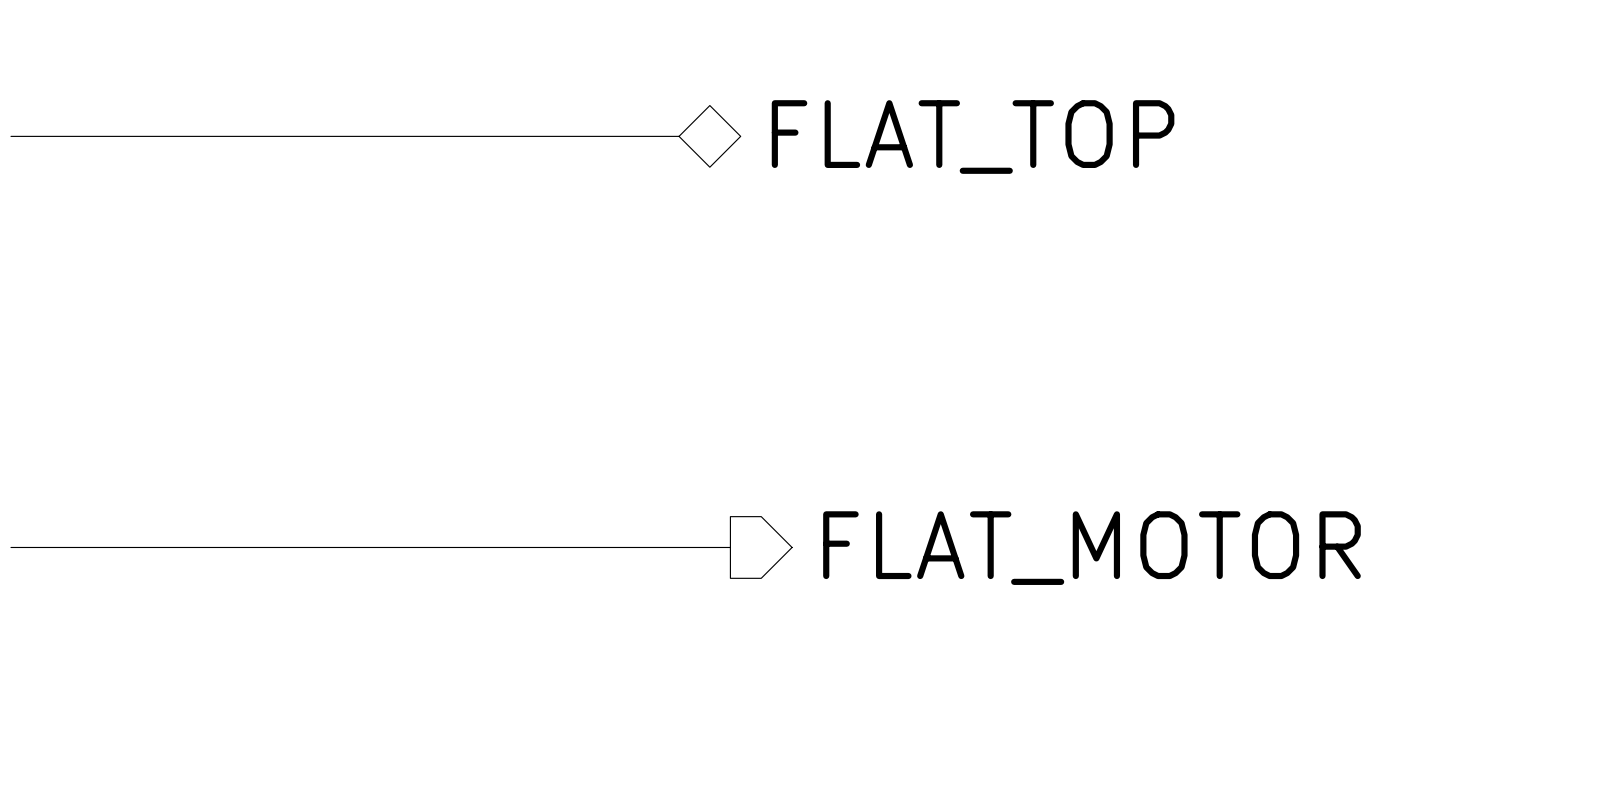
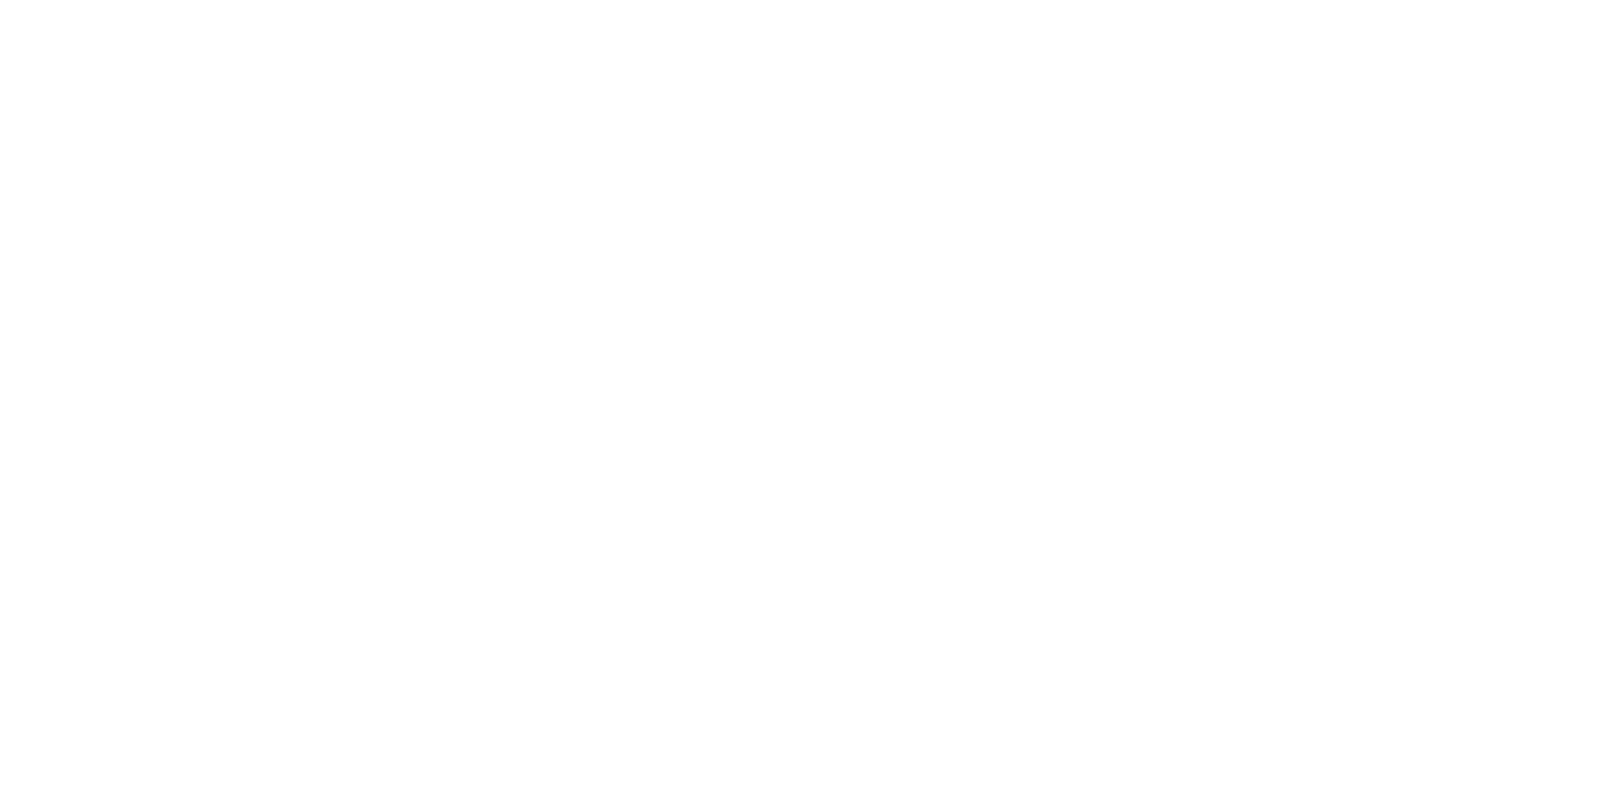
bus: (10, 136) (679, 136) -> none
hierarchical label: FLAT_TOP (973, 137) -> none
bus: (10, 547) (730, 547) -> none
hierarchical label: FLAT_MOTOR (1091, 548) -> none

